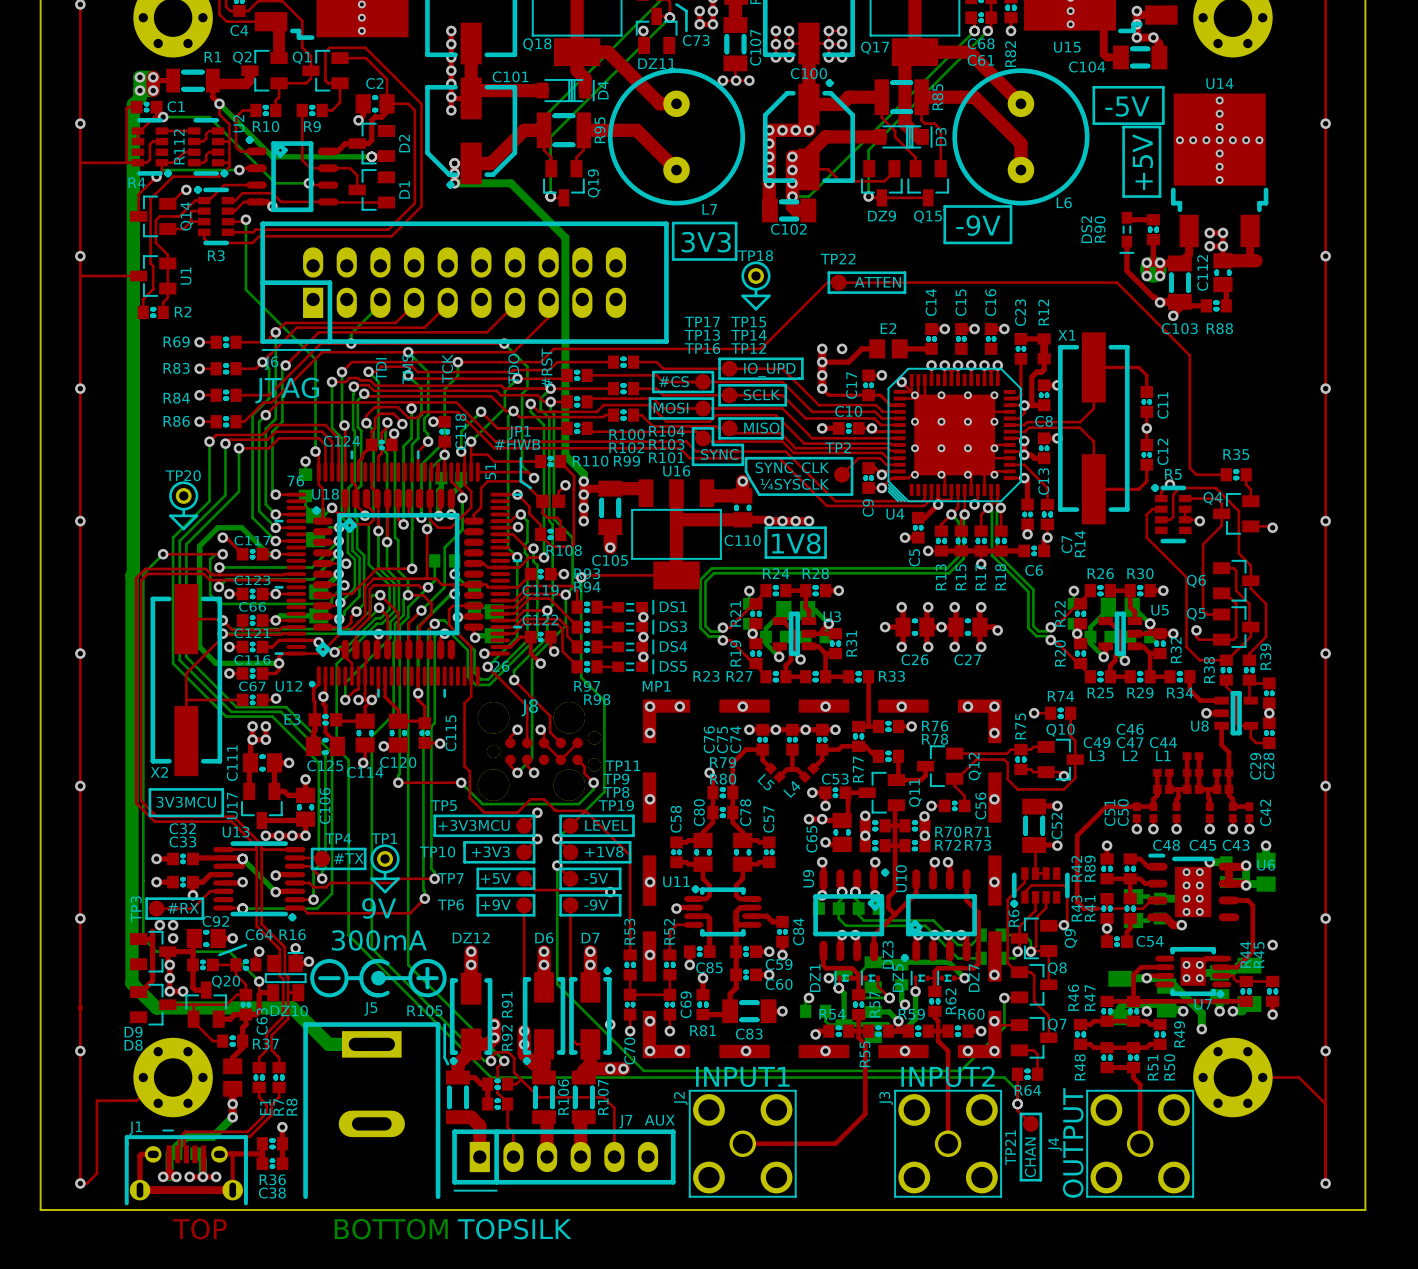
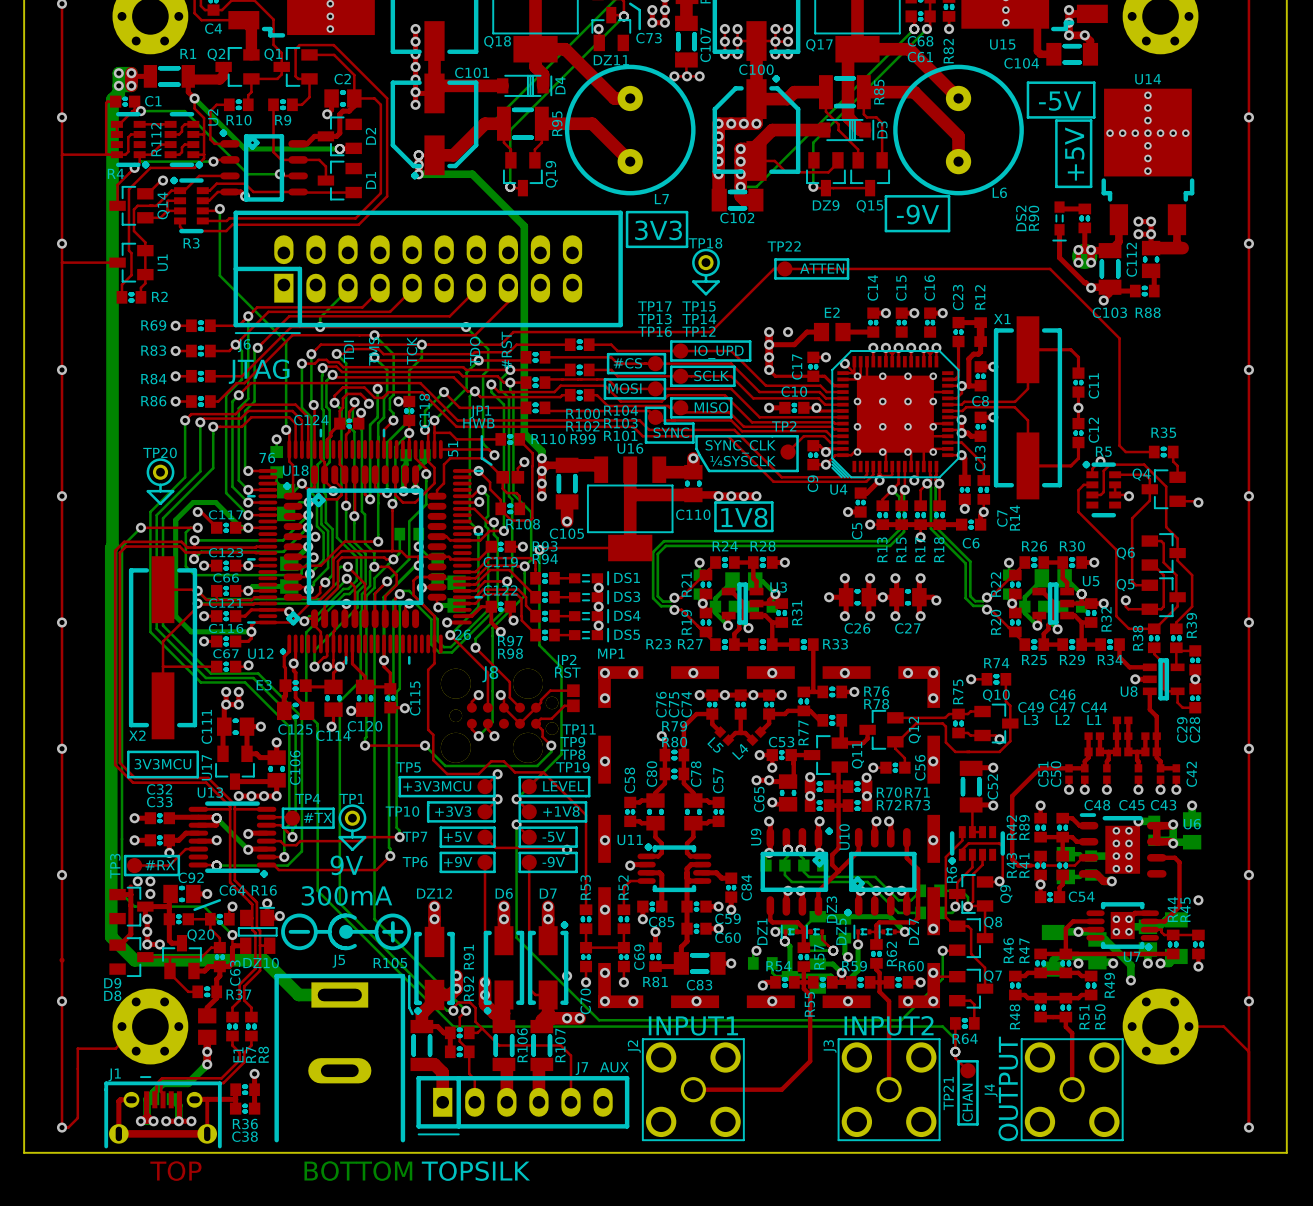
text: #HWB (517, 444) -> HWB (478, 423)
R97 name position: R97 (587, 686) -> R97 (510, 641)
R98 name position: R98 (597, 699) -> R98 (510, 653)
text: none -> RST (567, 672)
top track: none -> (573, 690) (550, 690) (536, 707)
JP2: none -> (573, 698)
top track: none -> (573, 705) (564, 705) (551, 718) (541, 718) (536, 723)

